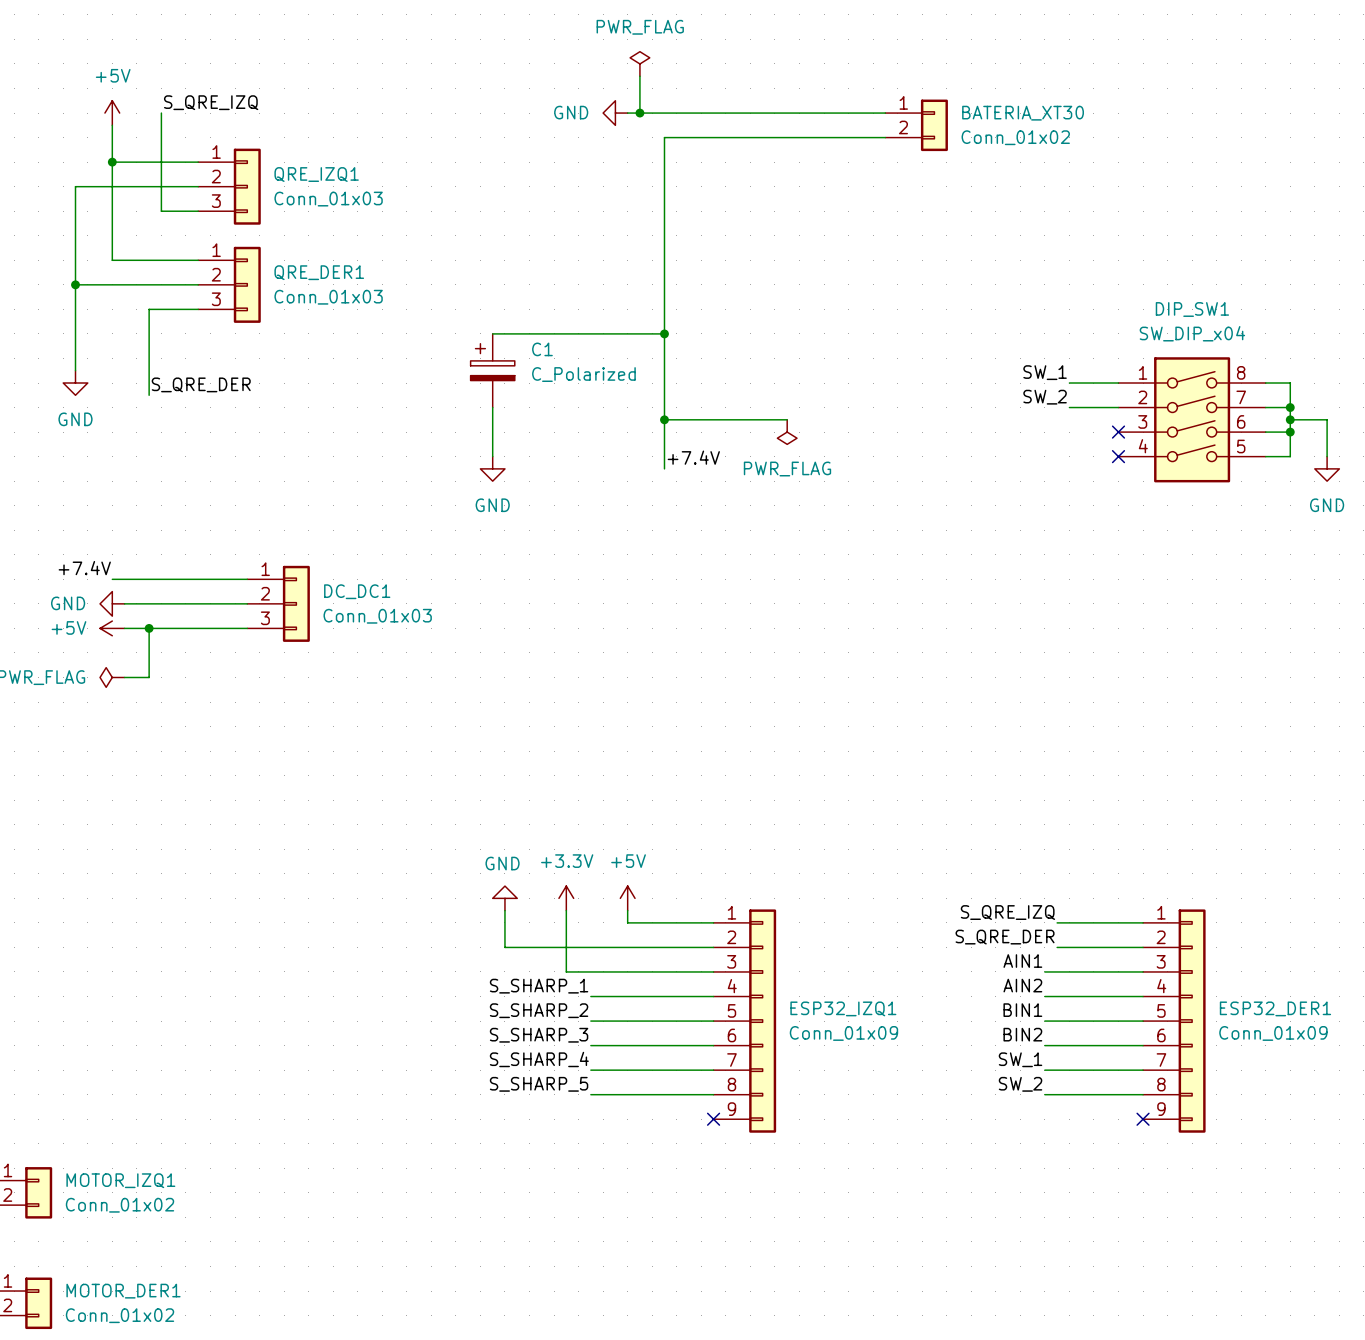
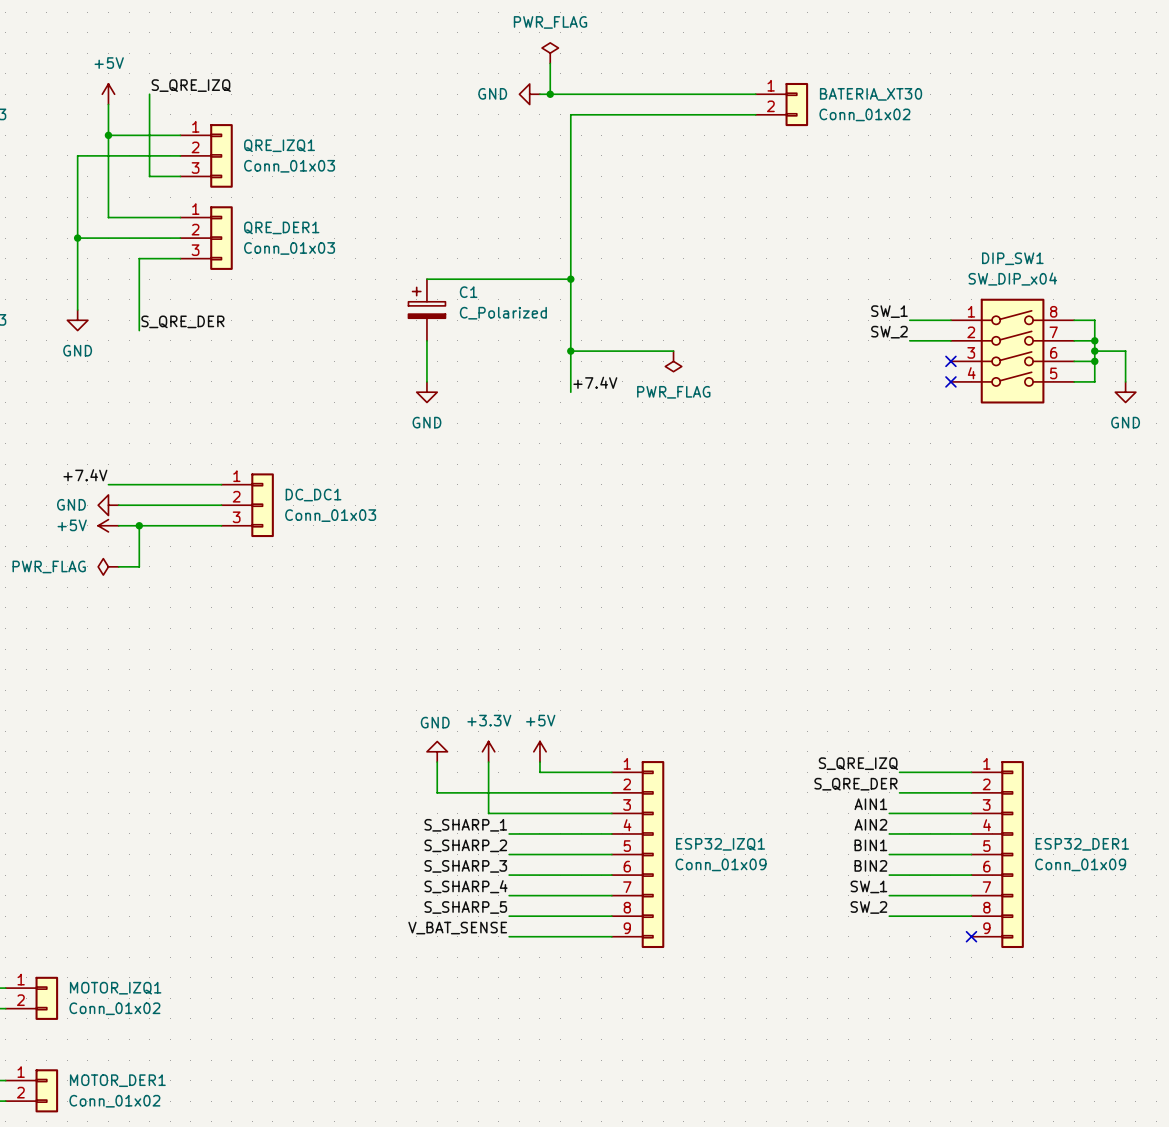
label: none -> V_BAT_SENSE (457, 928)
wire: none -> (509, 936) (611, 936)
no-connect mark: (713, 1119) -> none

